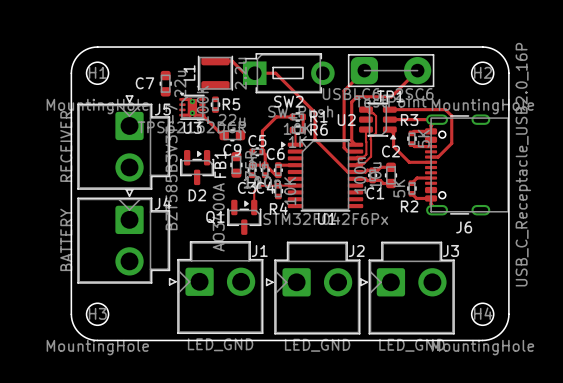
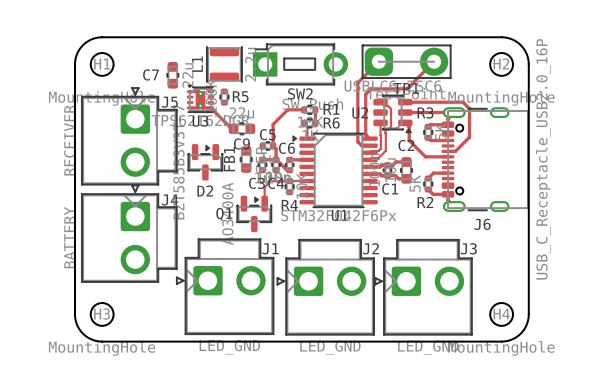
top track: (215, 61) (232, 61) (244, 73) (275, 73) (315, 112) (315, 139) (347, 172) (355, 172) -> none

